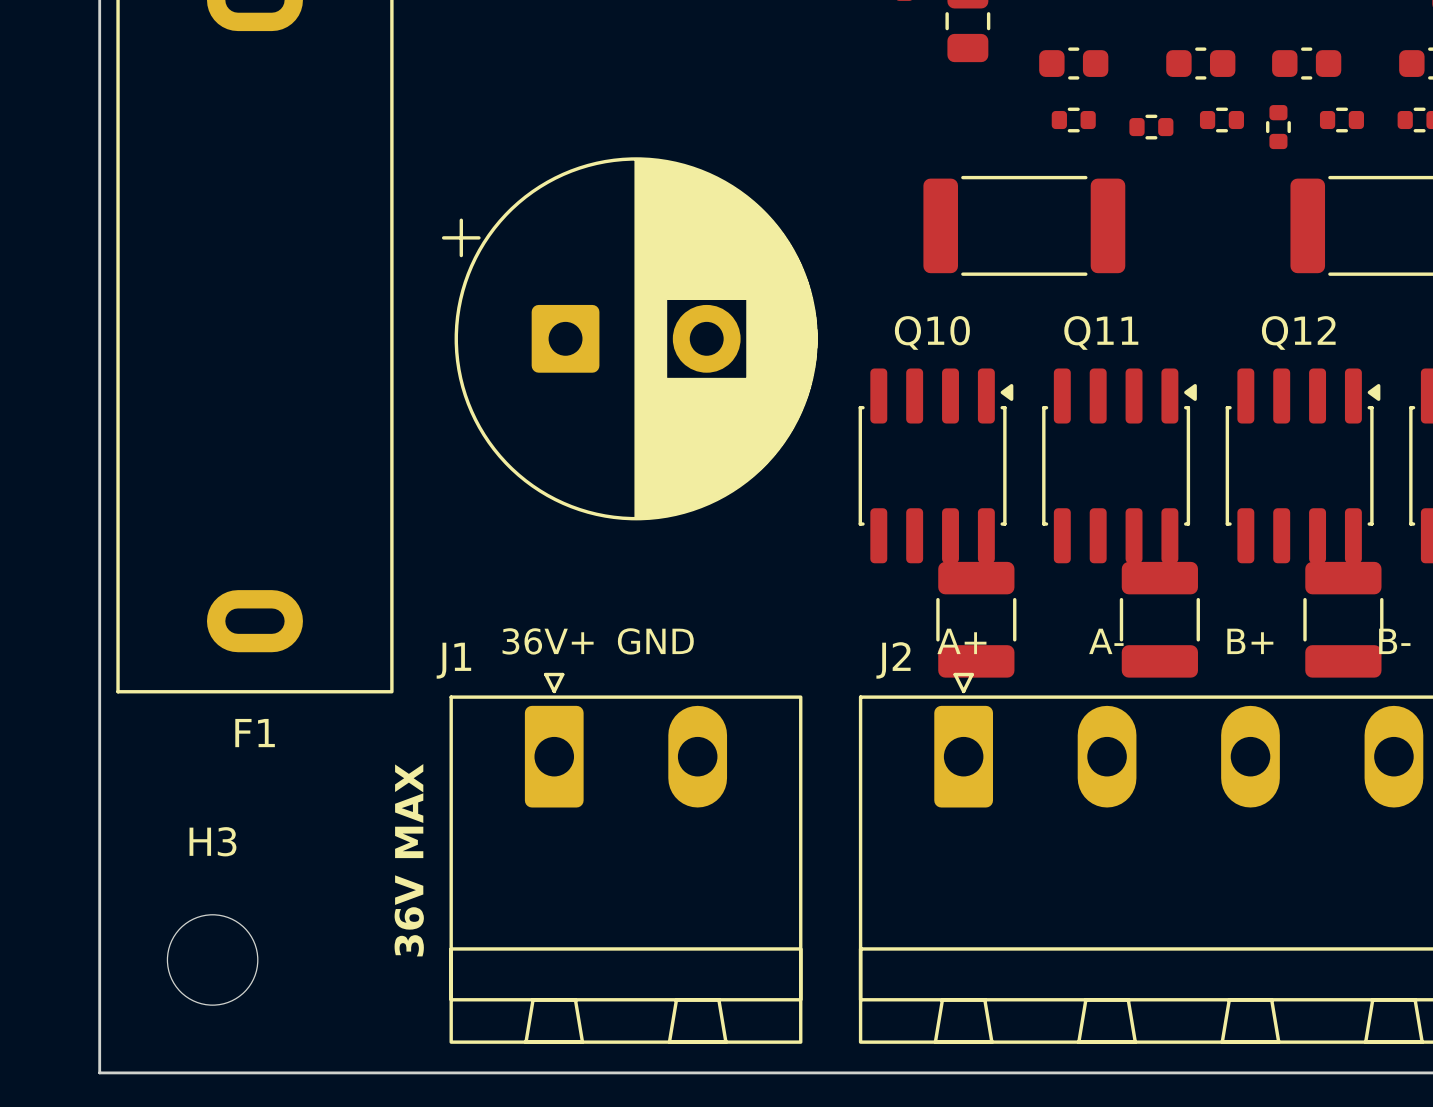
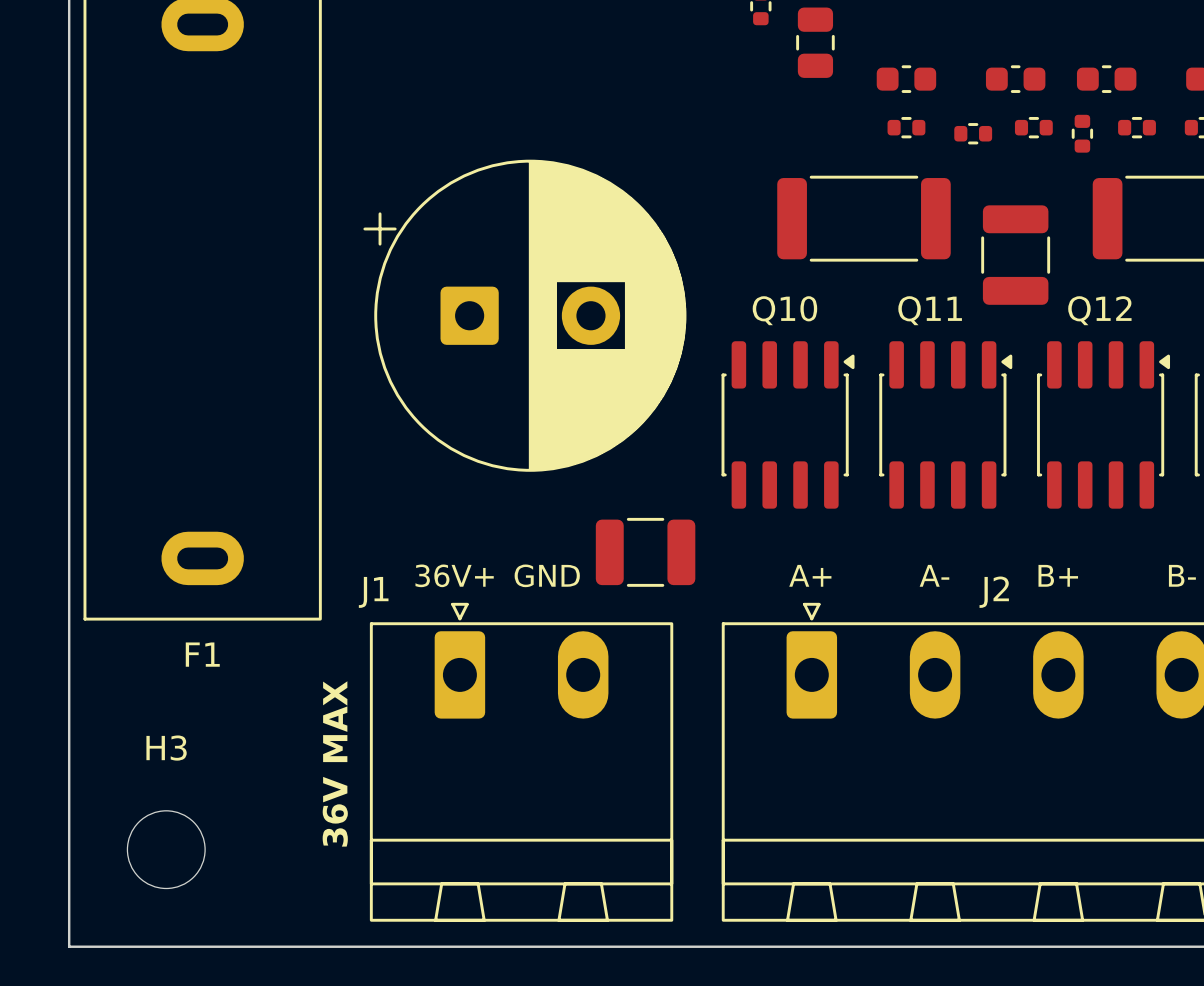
part: none -> (1015, 255)
part: none -> (645, 552)
part: (976, 619) -> none
part: (1159, 619) -> none
part: (1343, 619) -> none
J2 name position: J2 (893, 660) -> J2 (994, 592)

